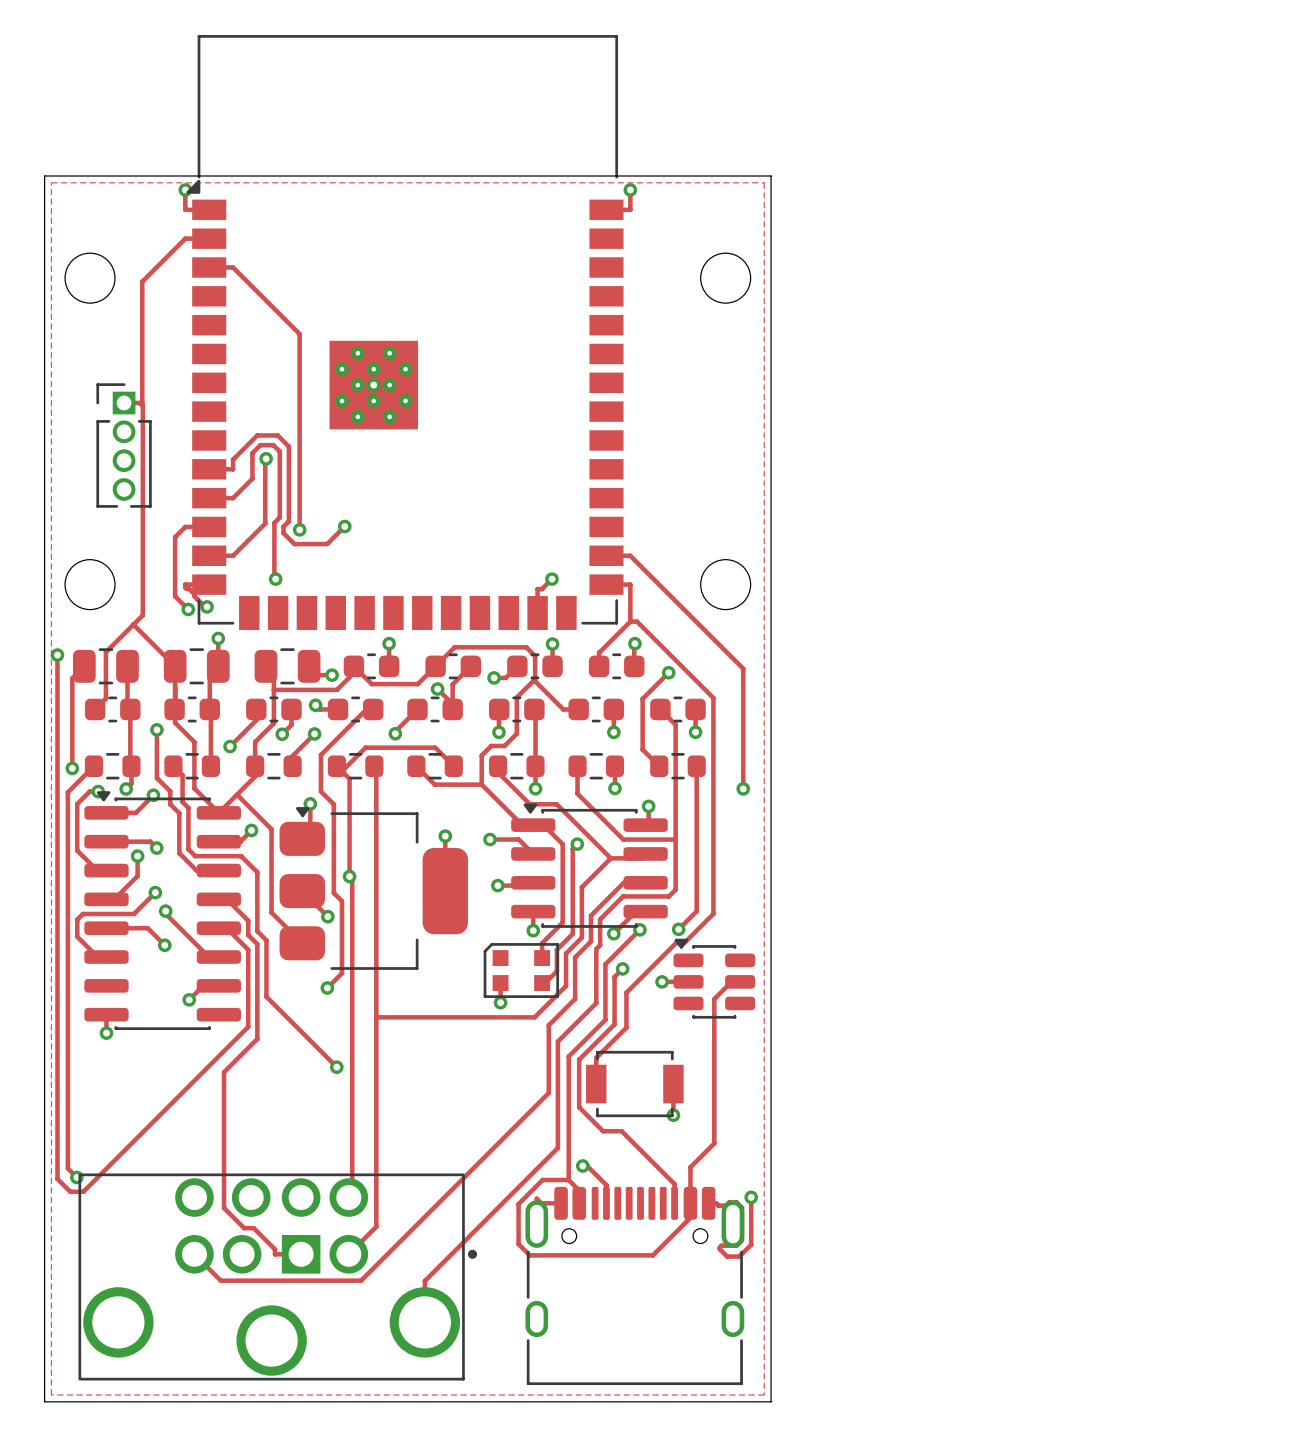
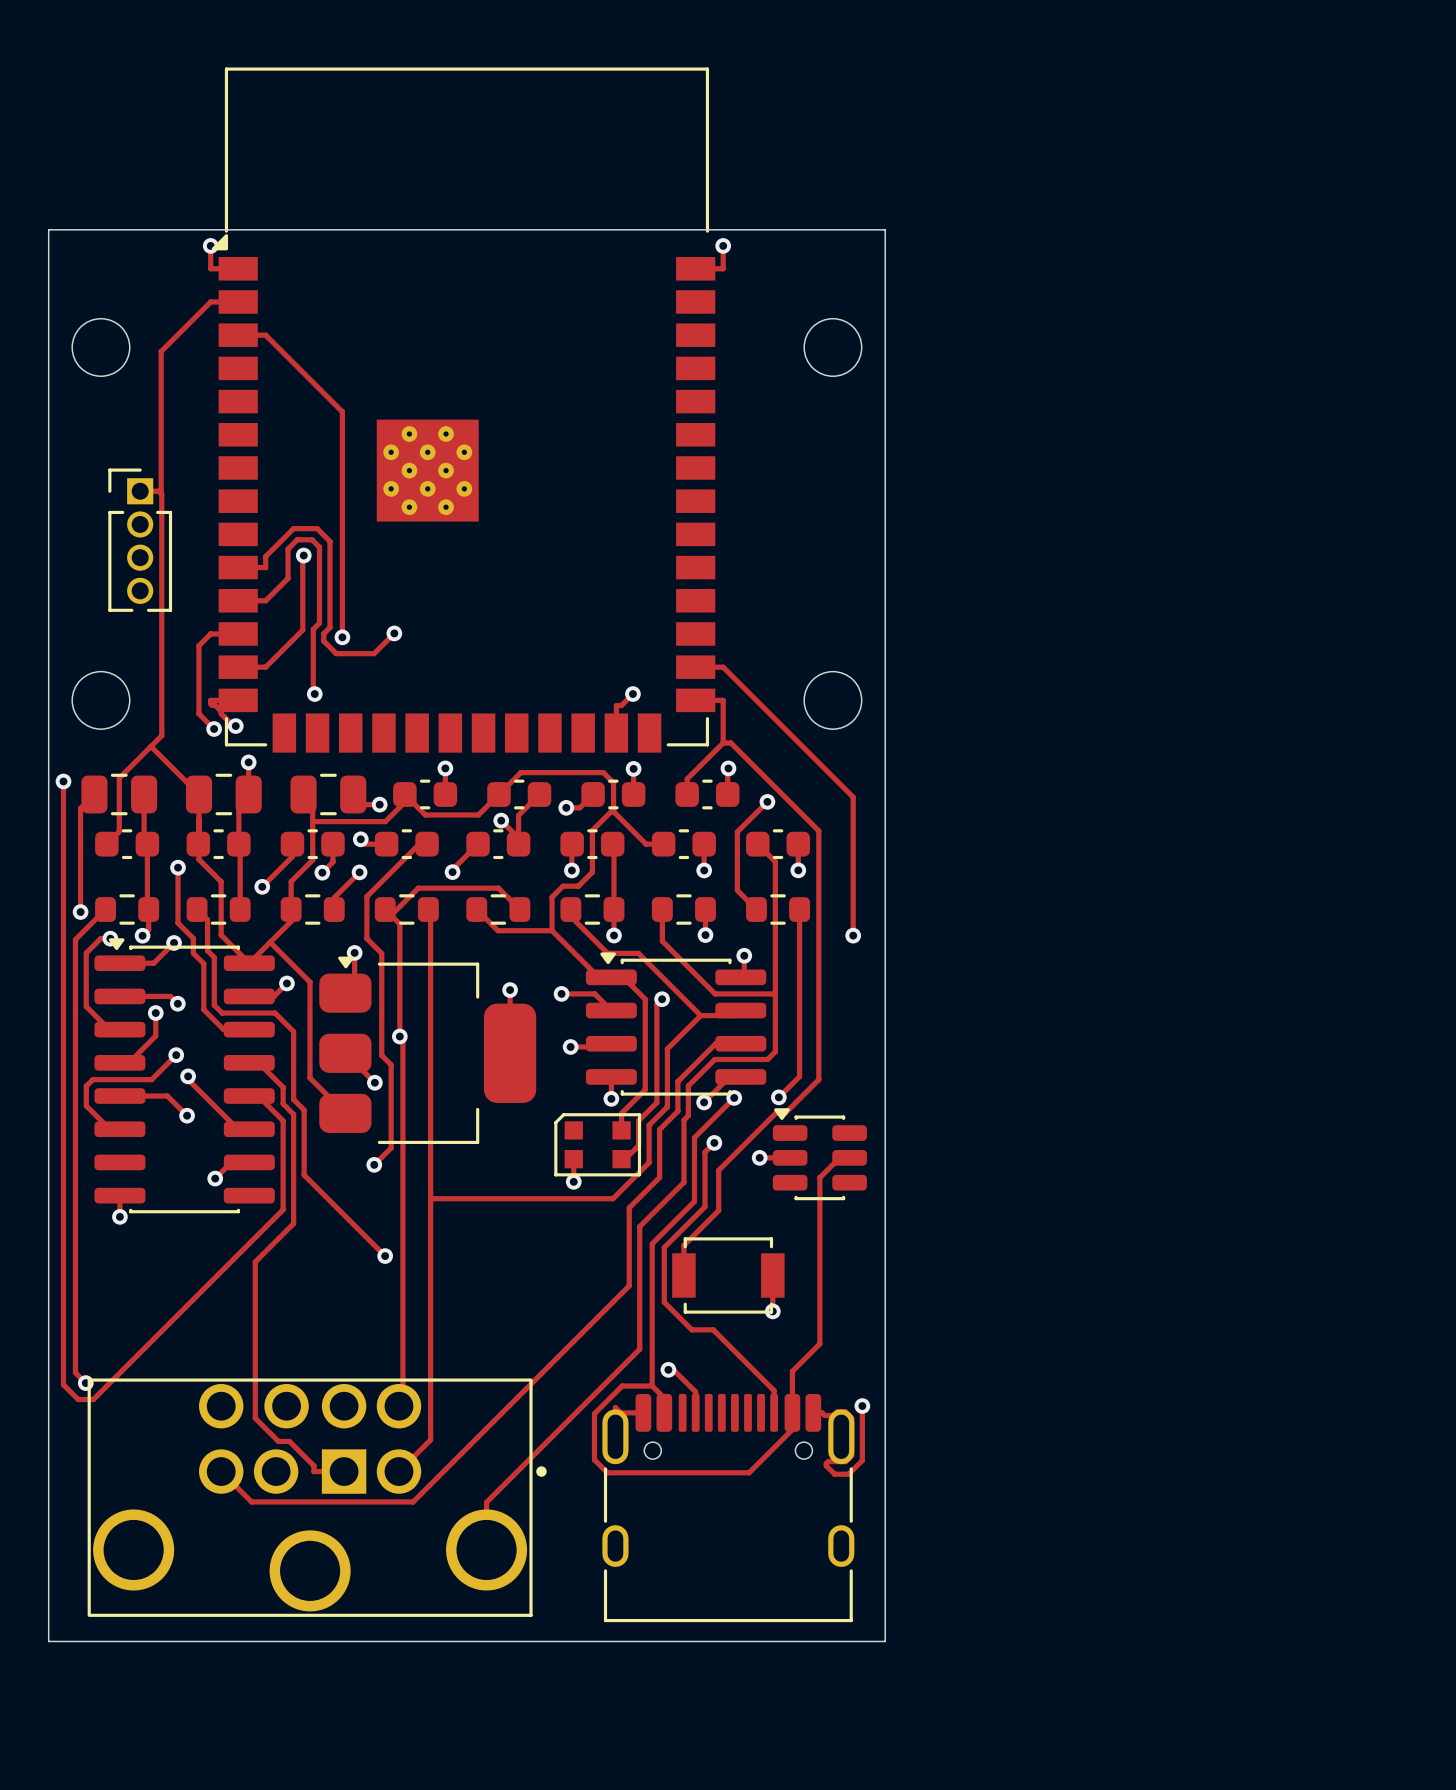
zone outline: (51, 182) (764, 182) (764, 1395) (51, 1395) (51, 182) -> none
via: (373, 385) -> none

